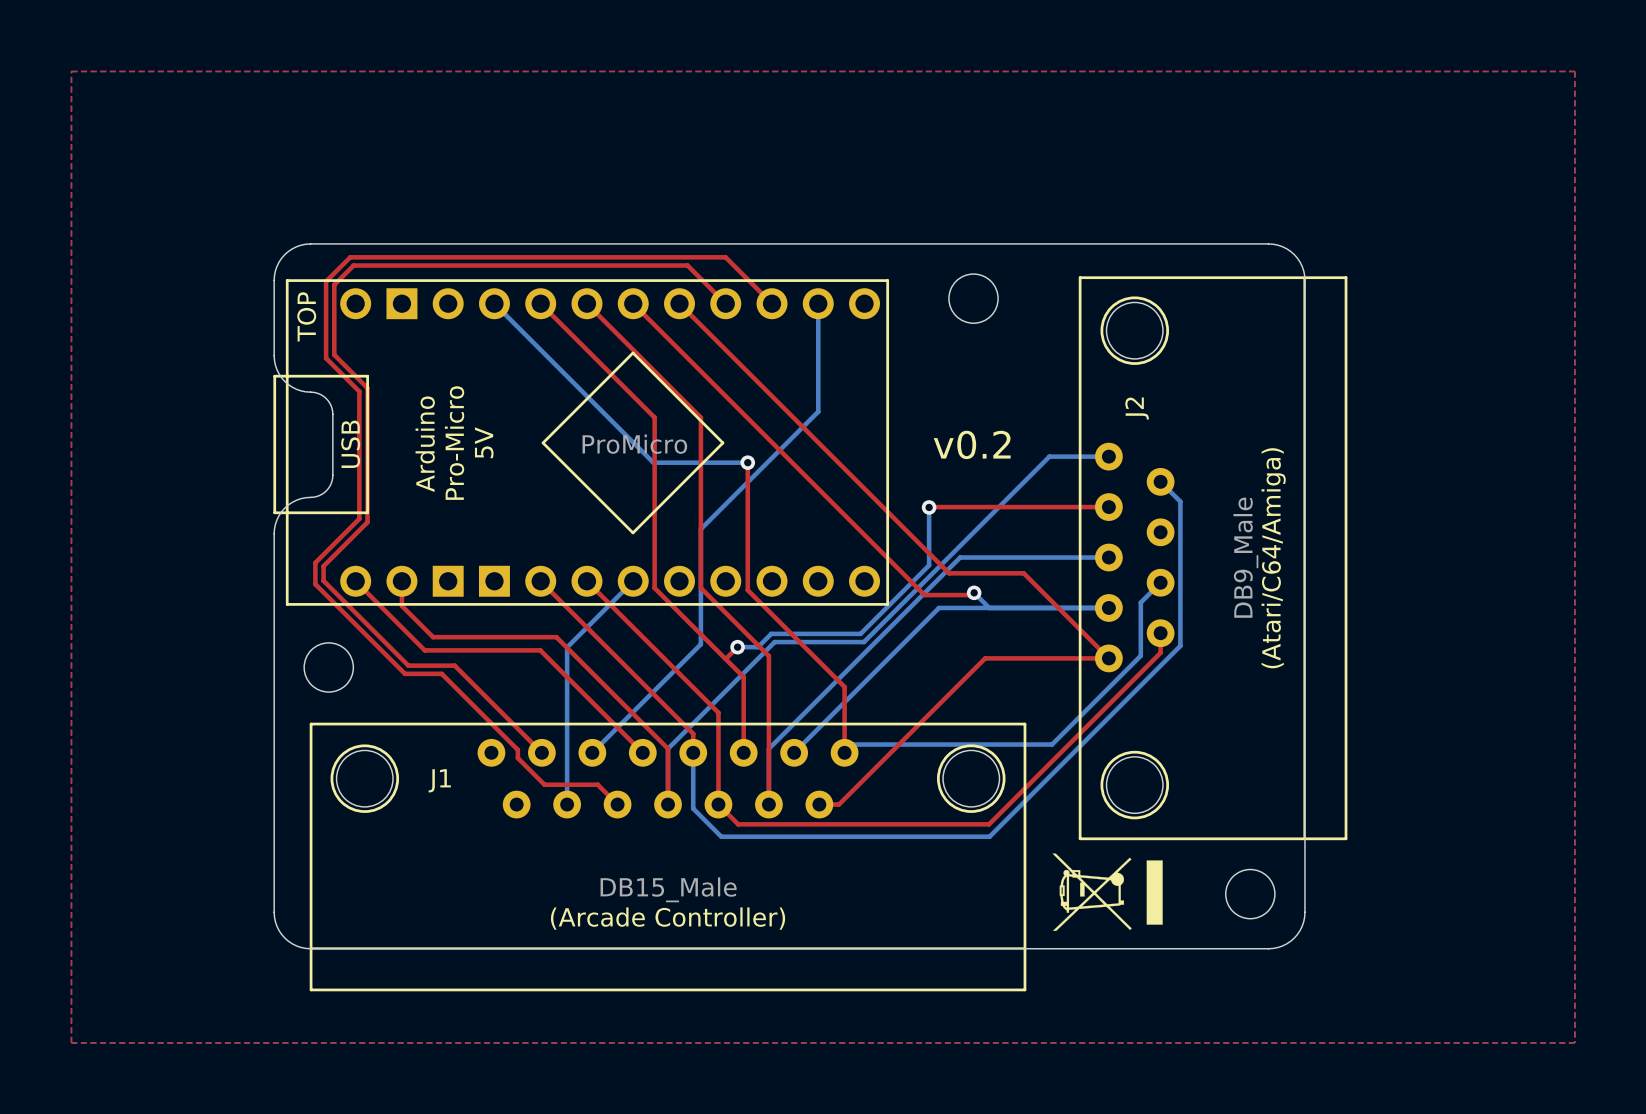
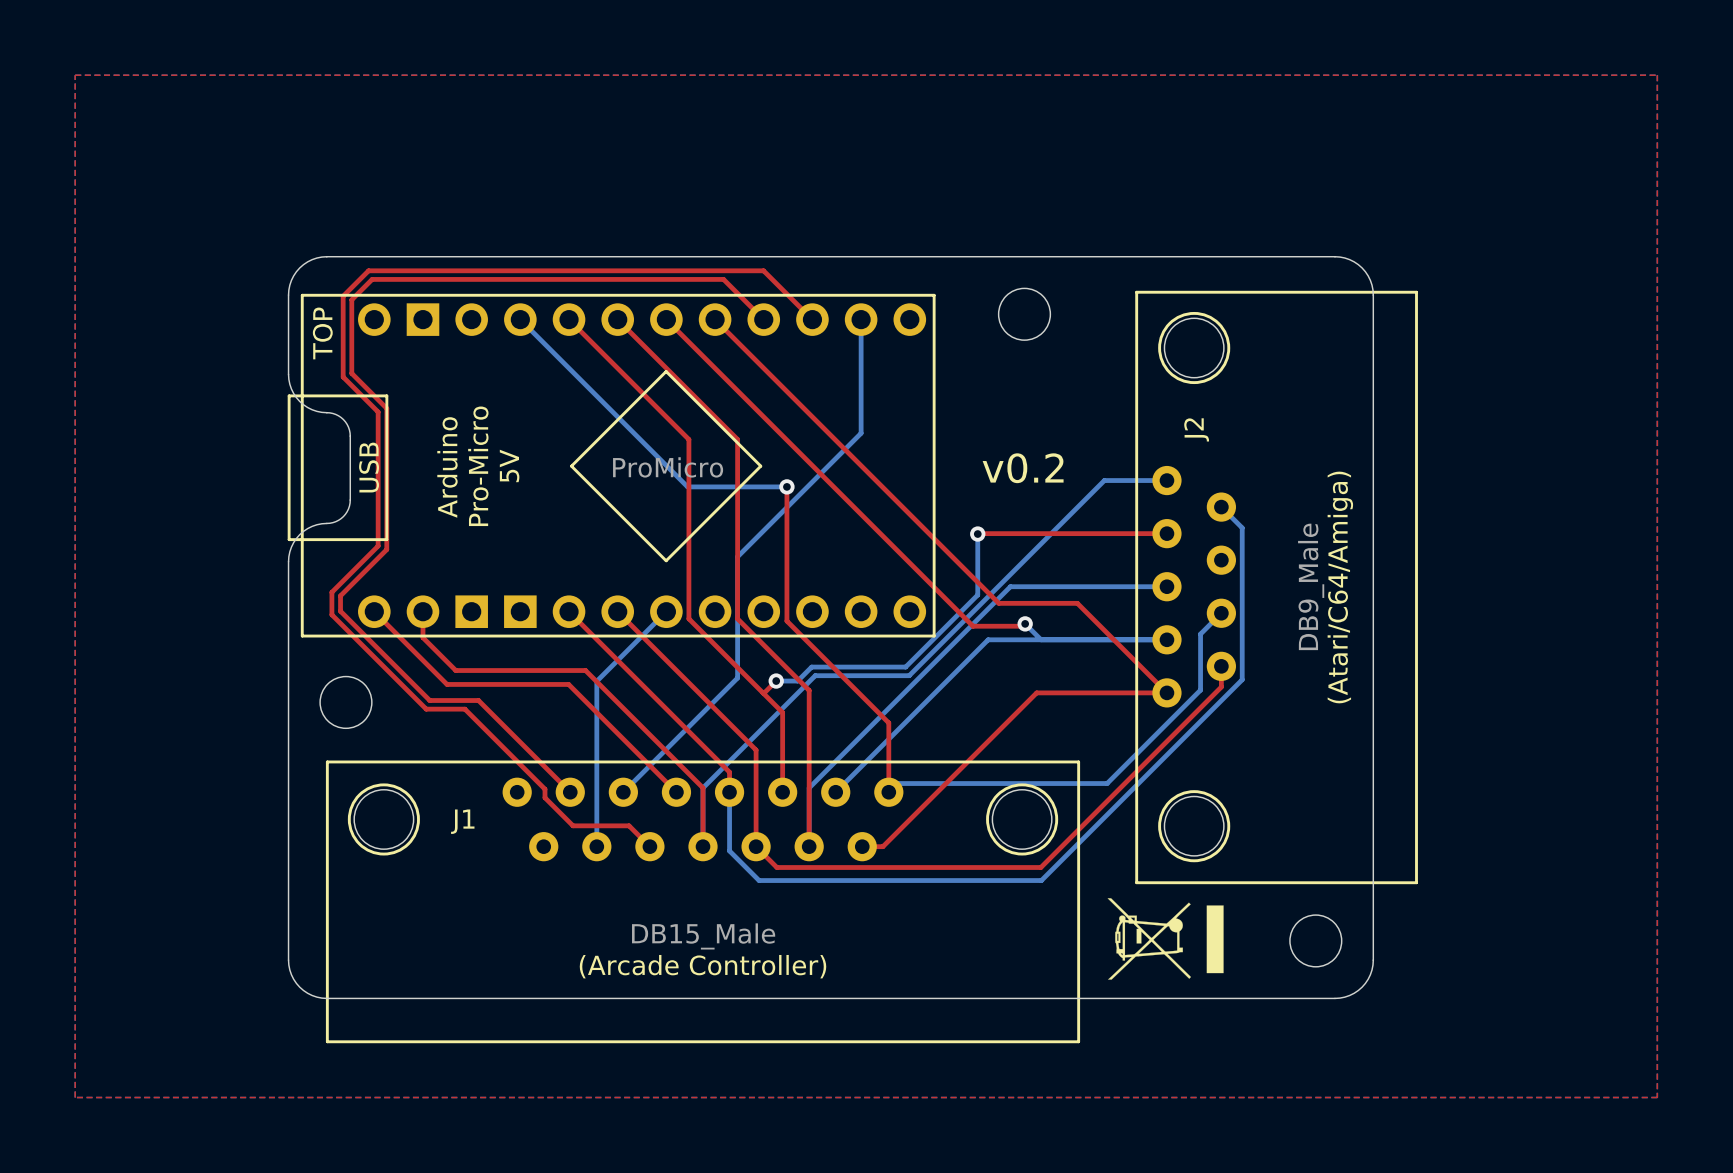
J2 footprint: [1078, 276, 1348, 841] -> [1135, 290, 1418, 885]
J1 footprint: [309, 722, 1027, 992] -> [325, 760, 1081, 1044]

